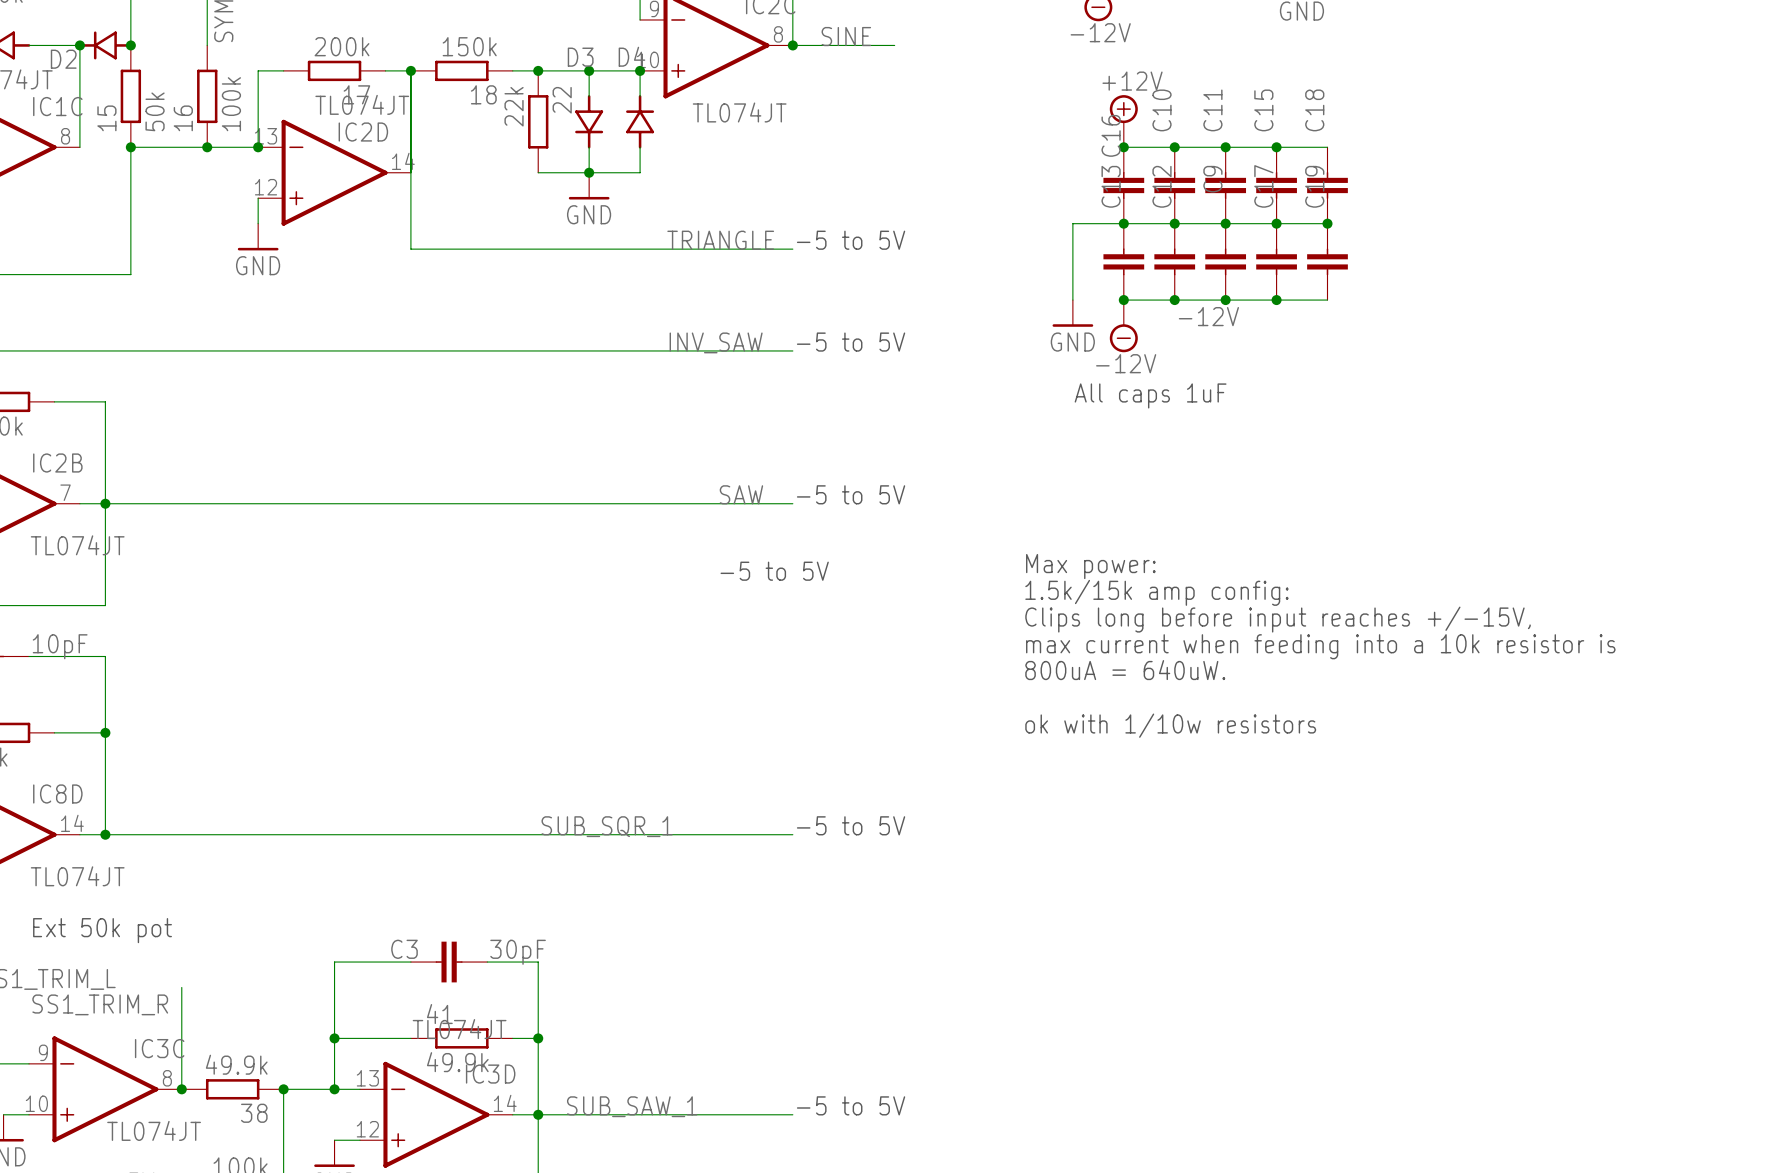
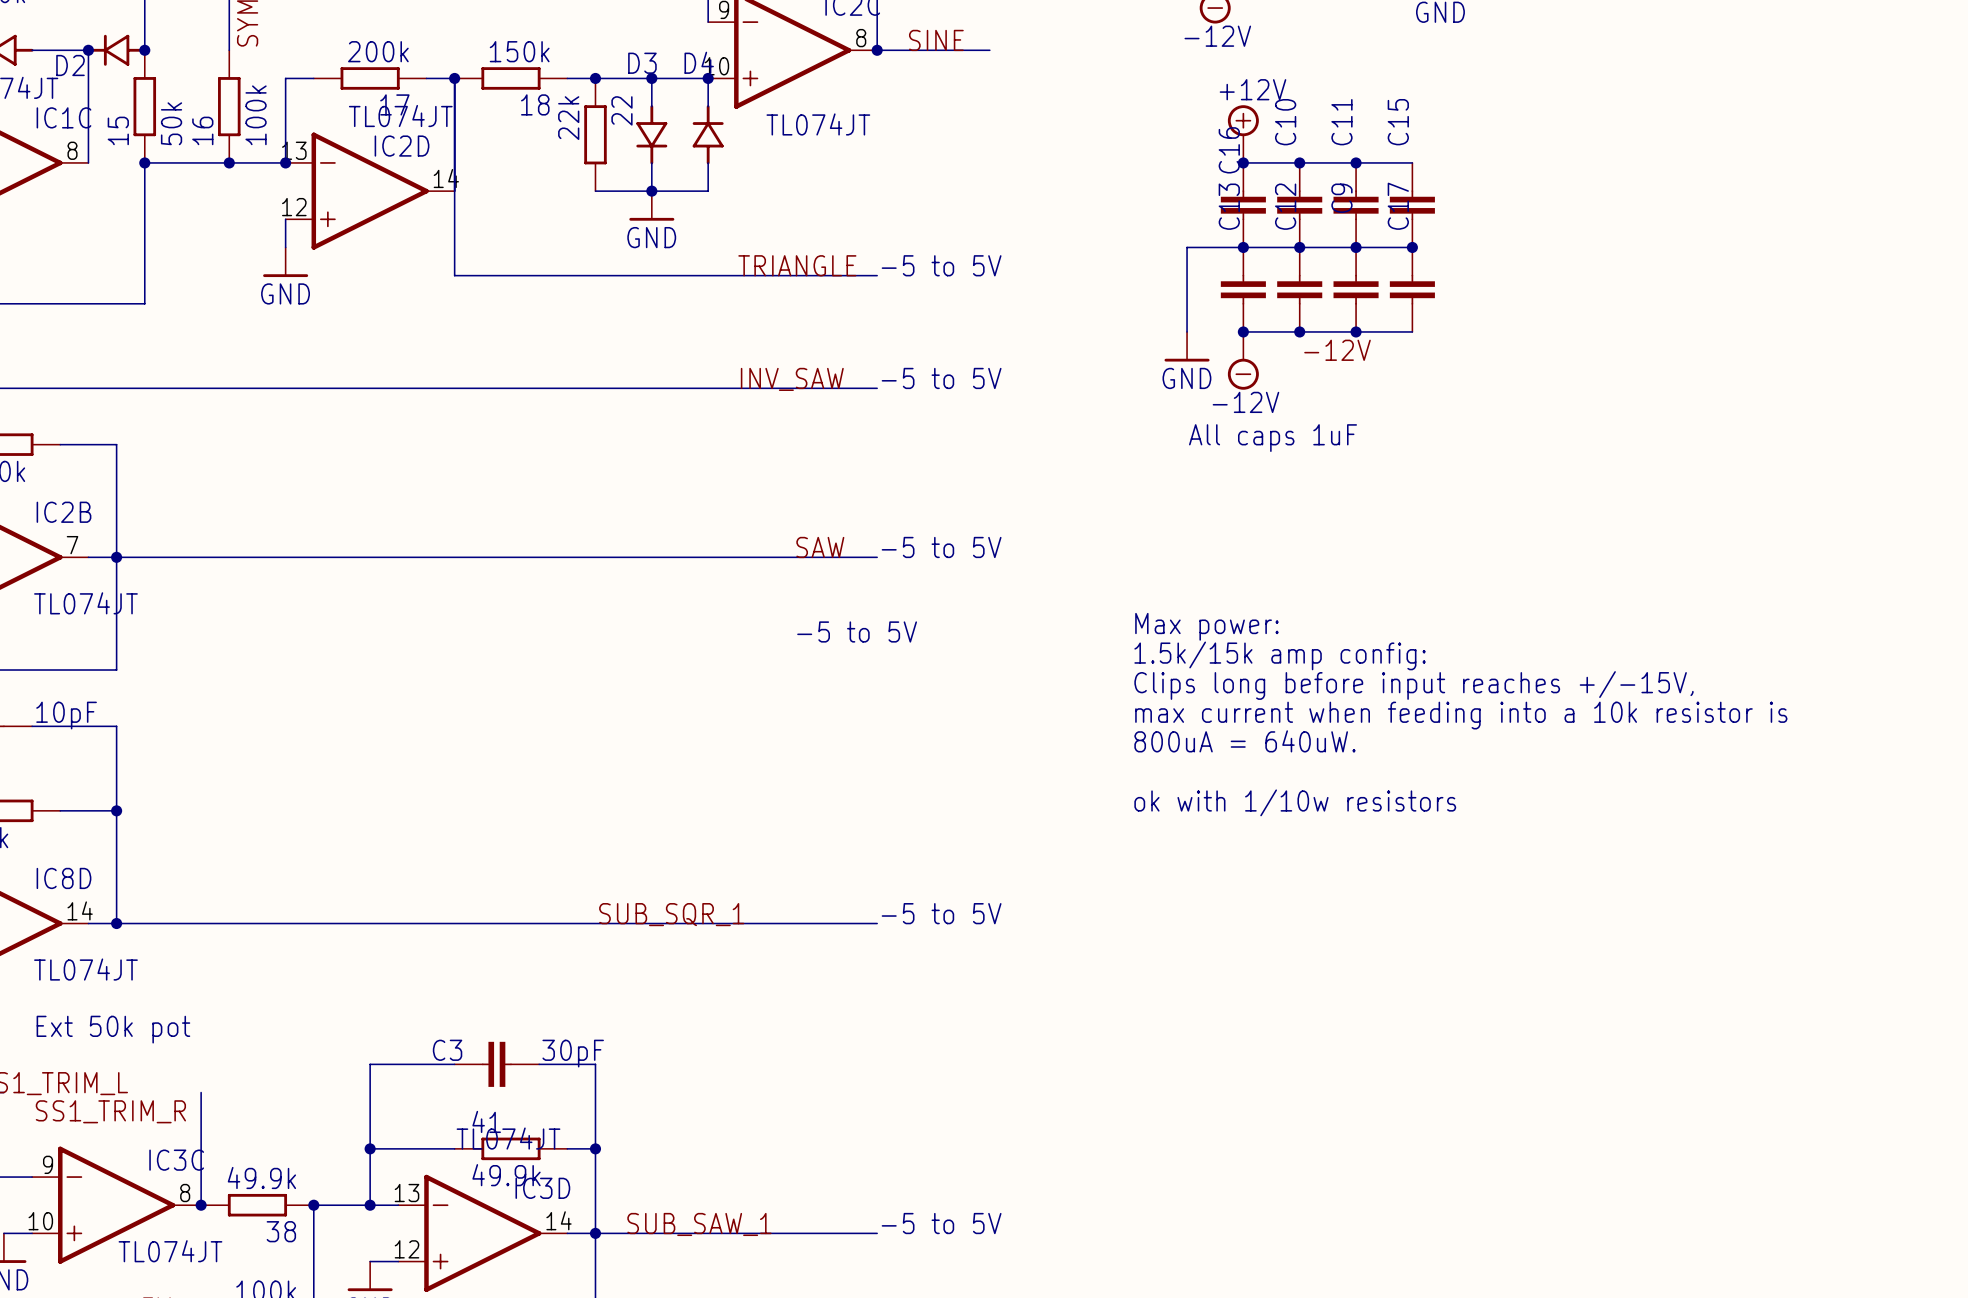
wire: (1276, 147) (1327, 147) -> none
junction: (1276, 147) -> none
C18: (1327, 185) -> none
wire: (1276, 223) (1327, 223) -> none
junction: (1327, 223) -> none
C19: (1327, 261) -> none
wire: (1276, 300) (1327, 300) -> none
junction: (1276, 300) -> none

